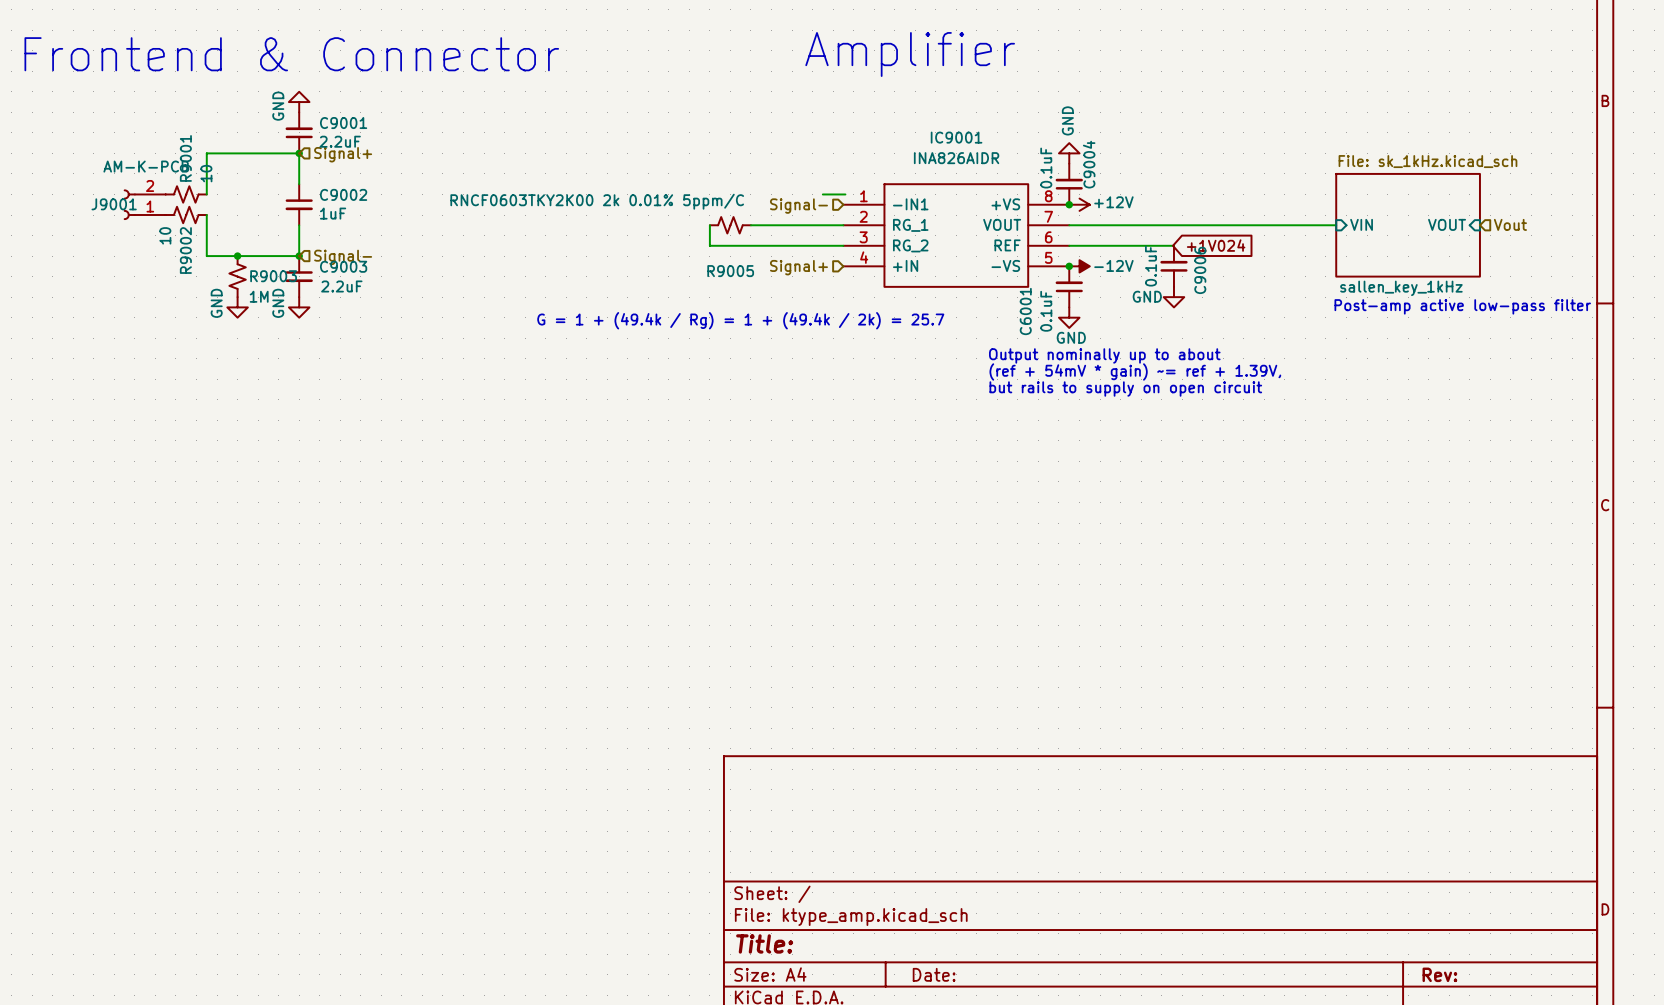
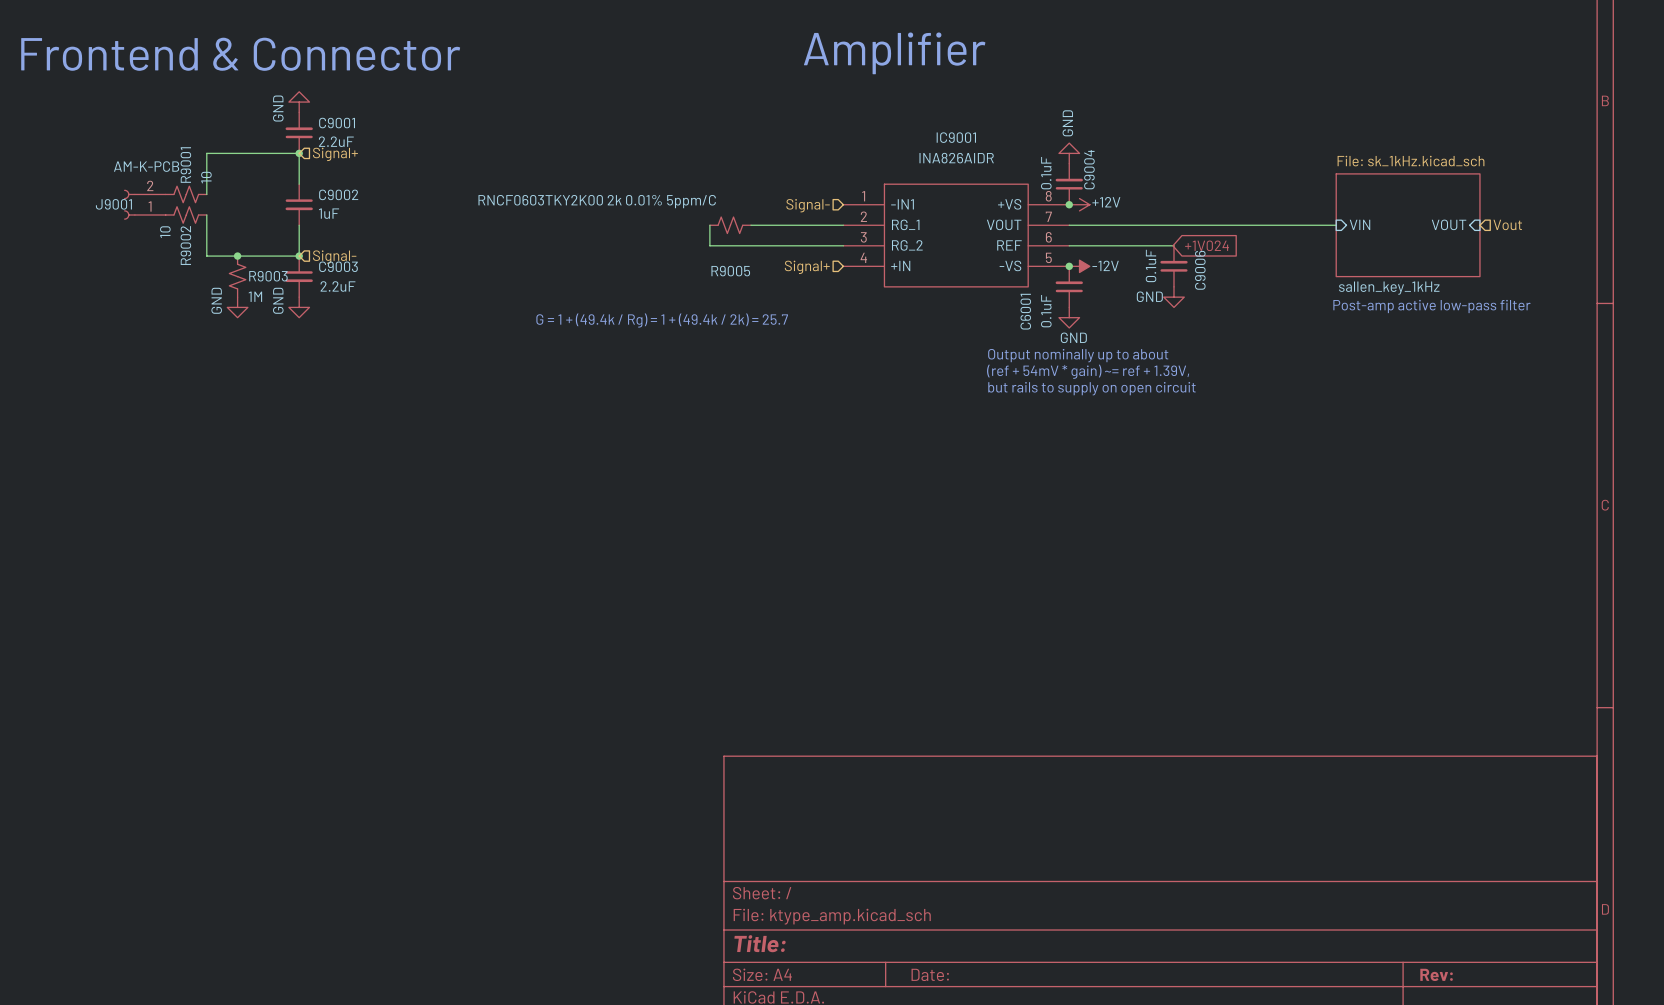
wire: (822, 194) (845, 194) -> none

